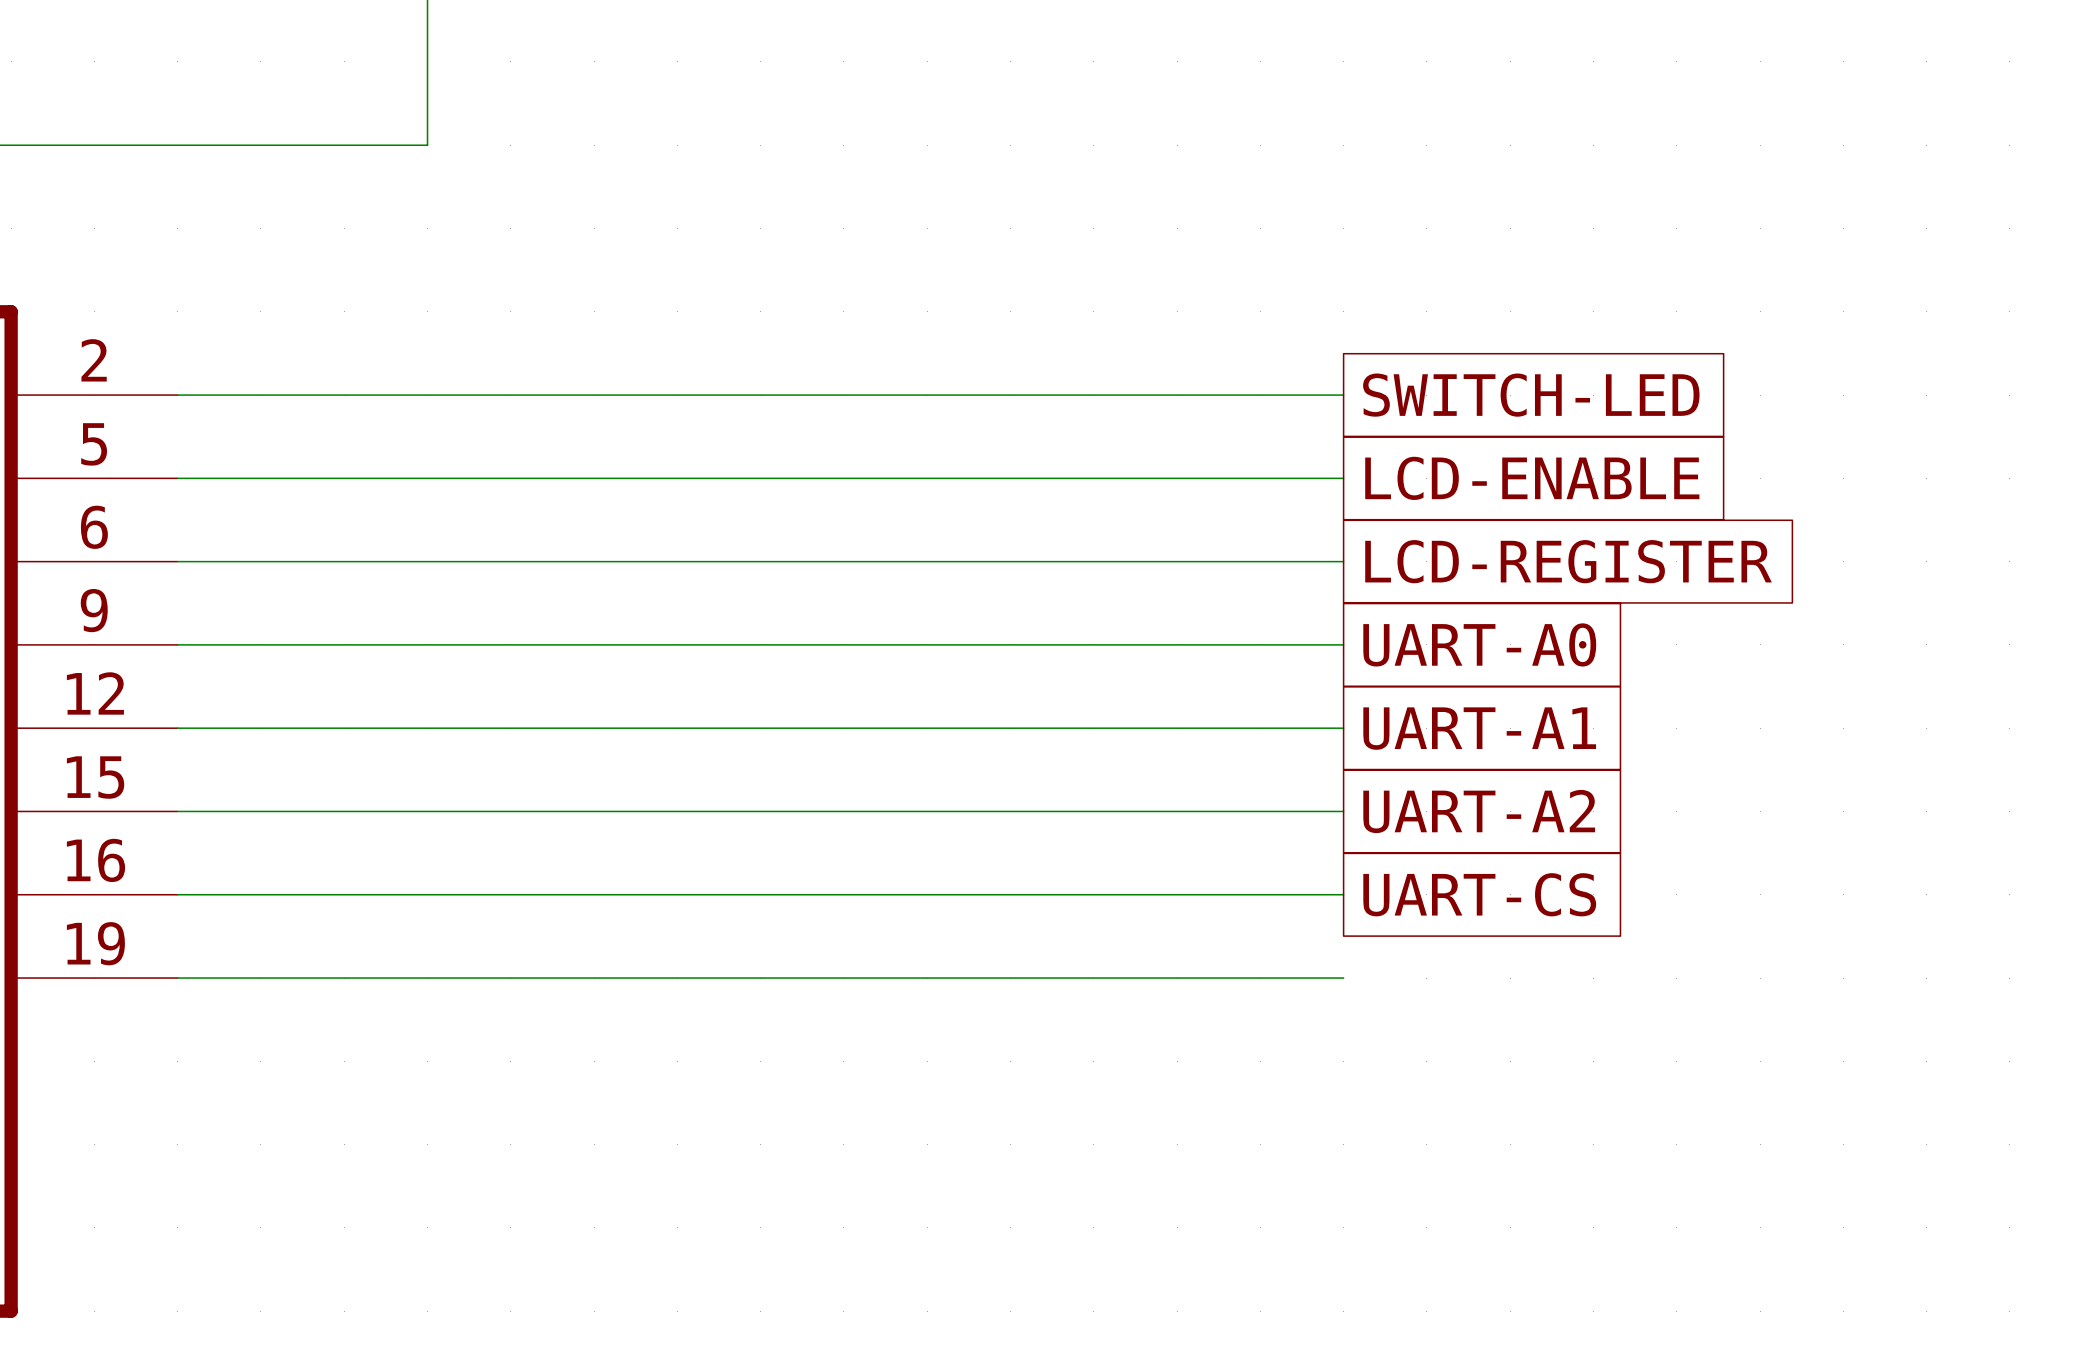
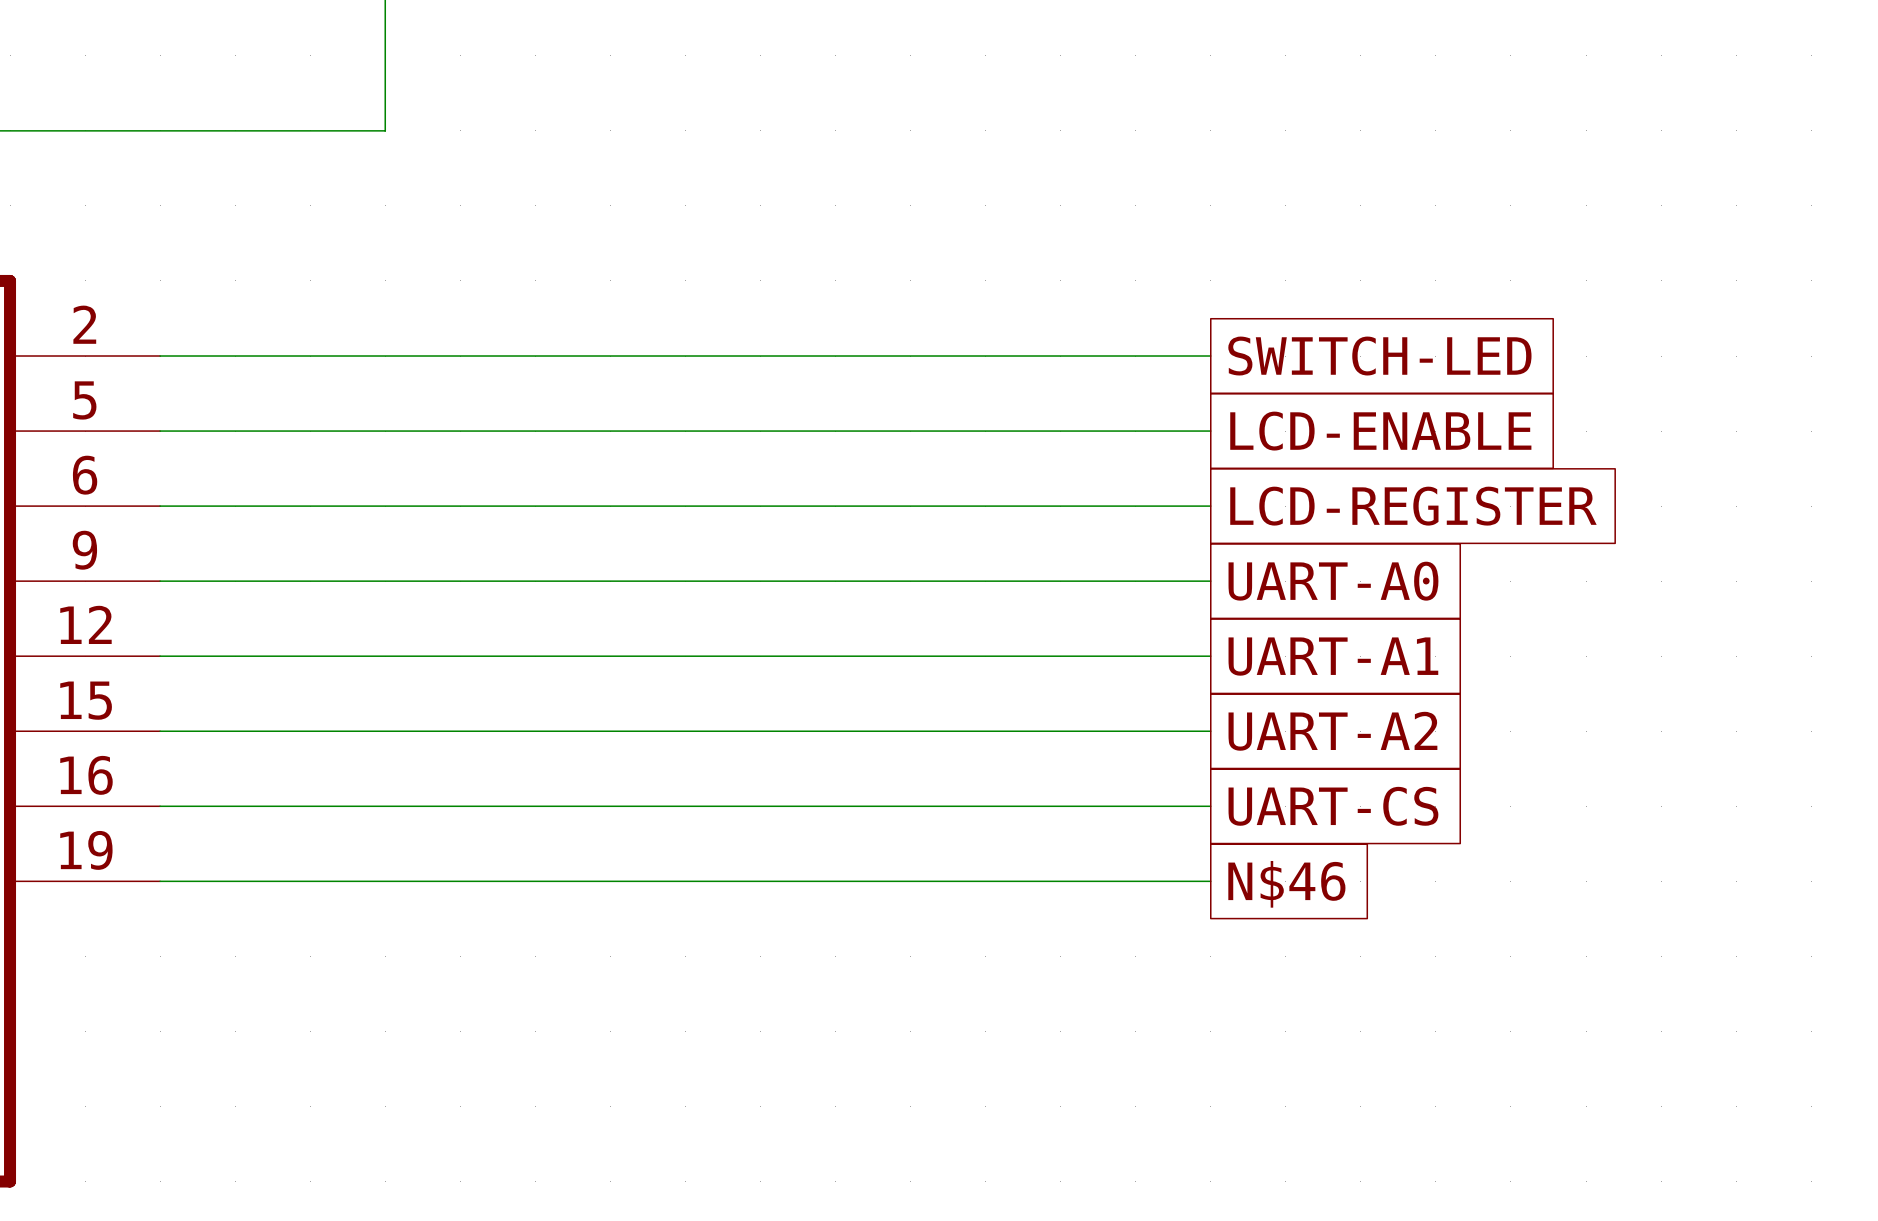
global label: none -> N$46 (1286, 884)

